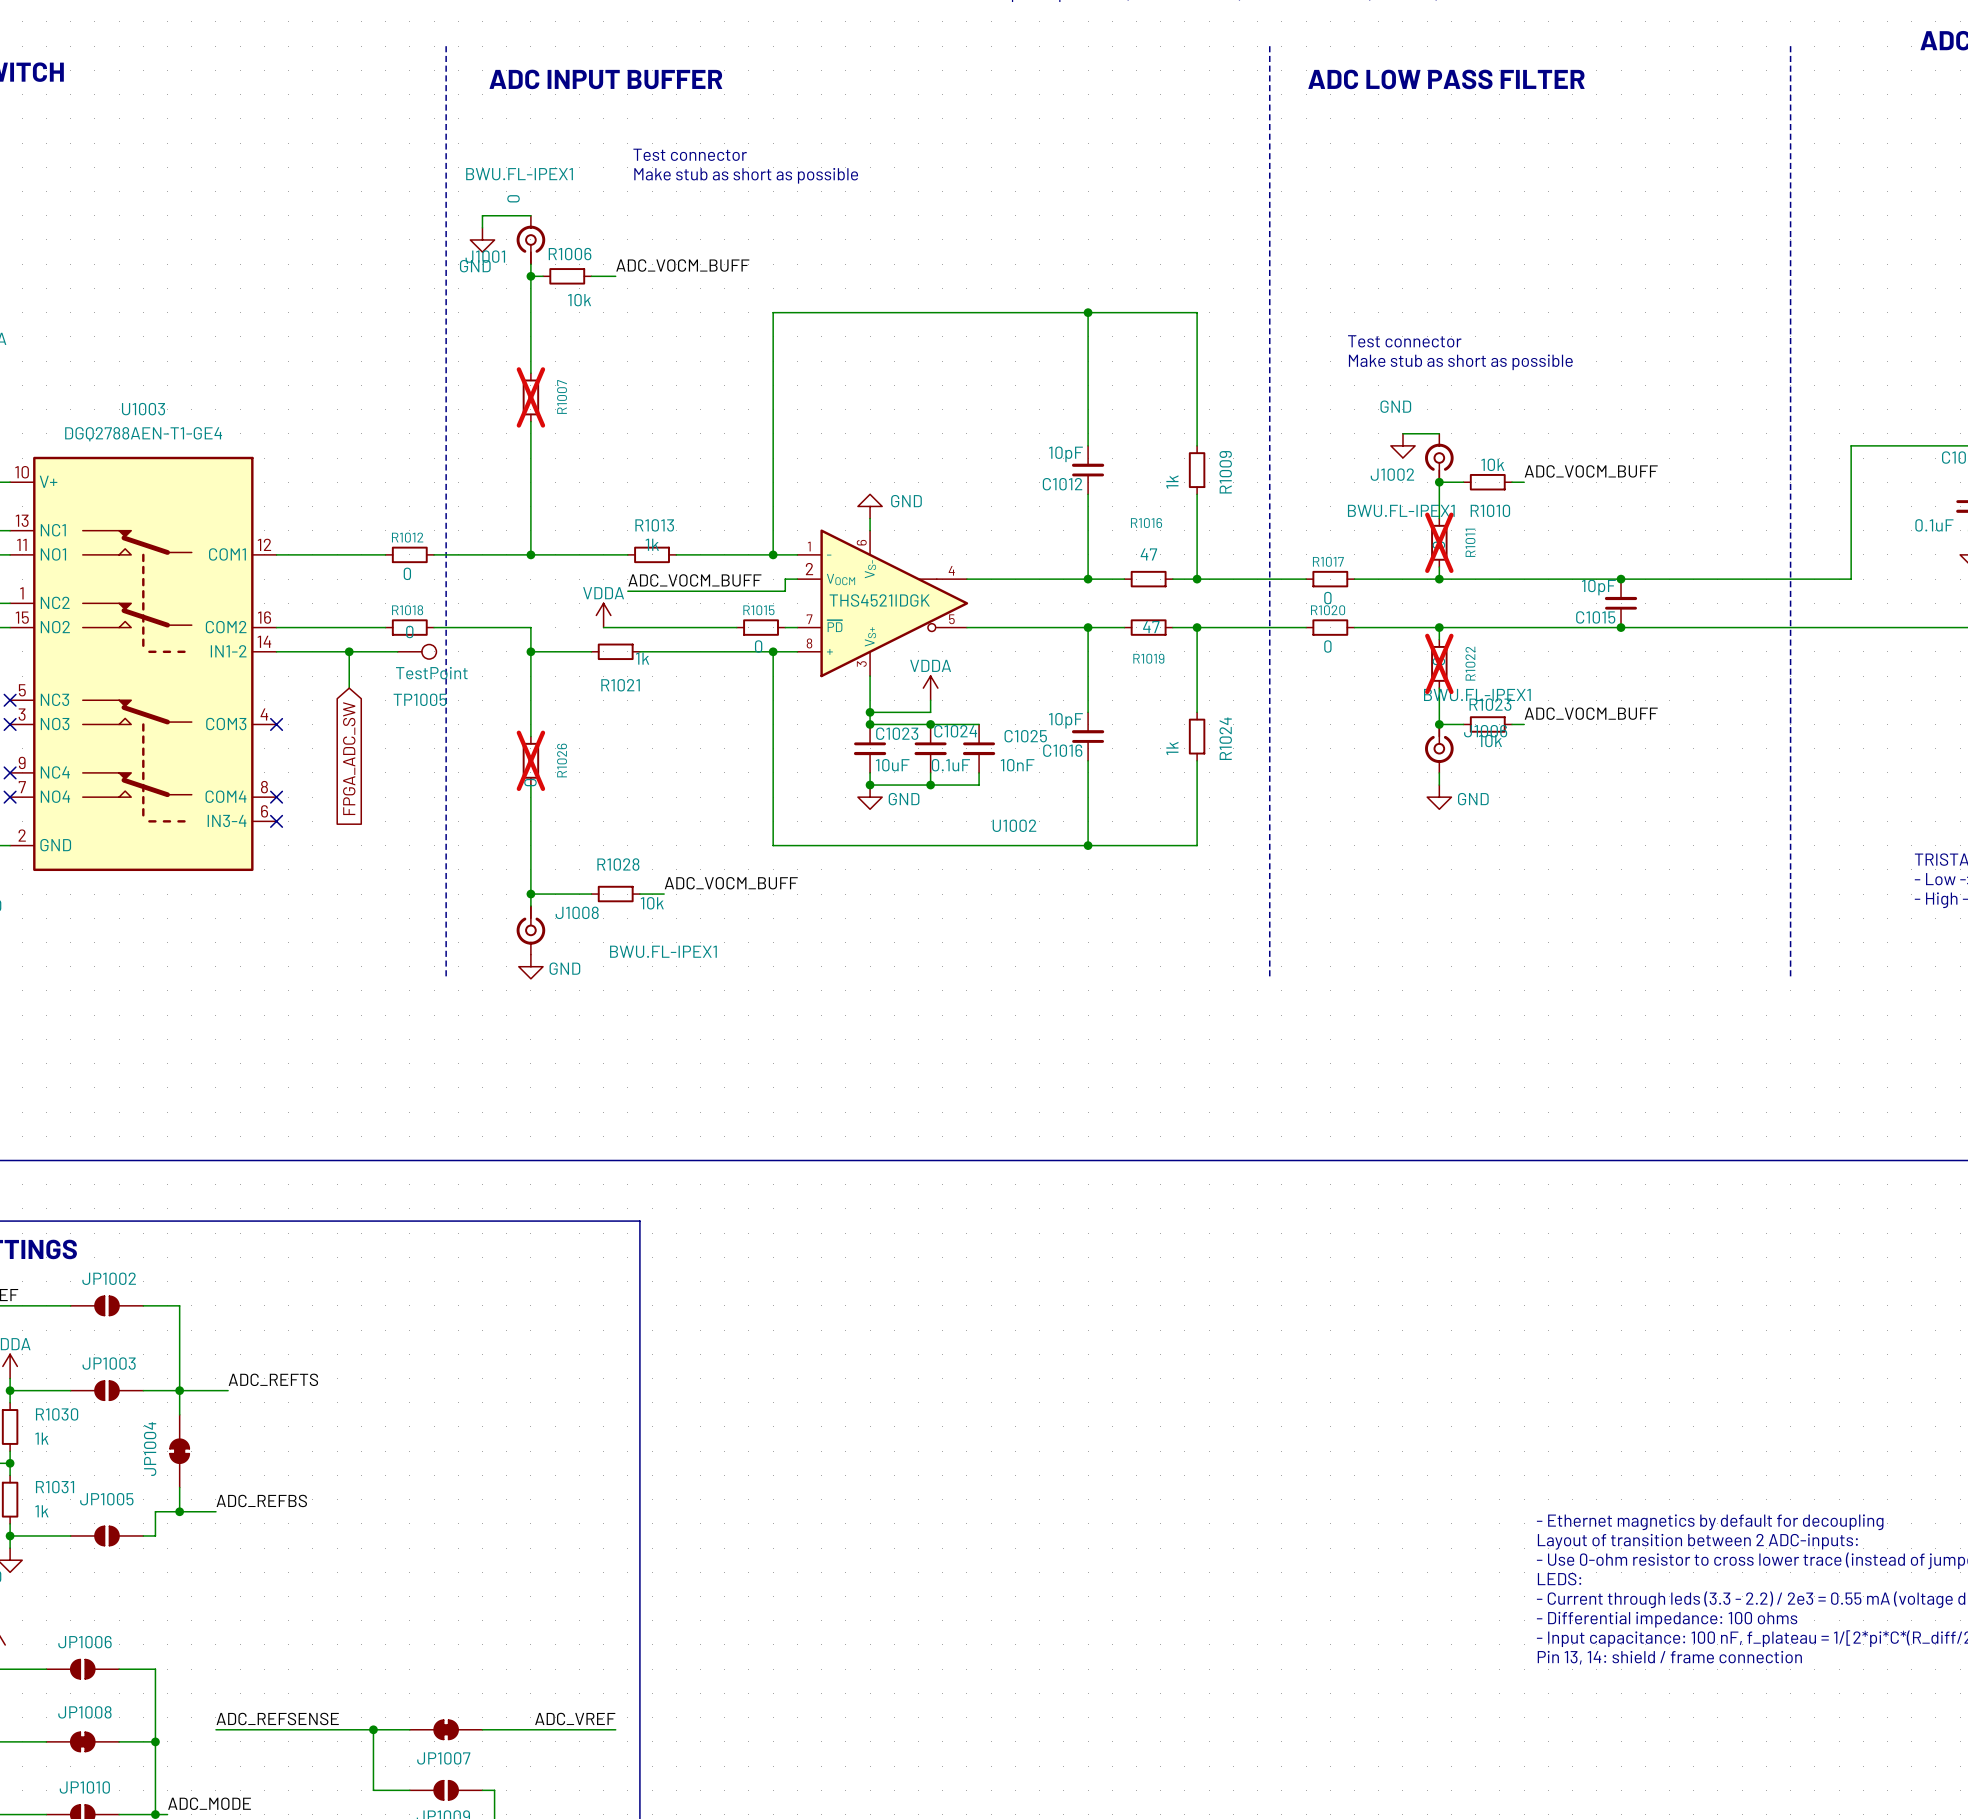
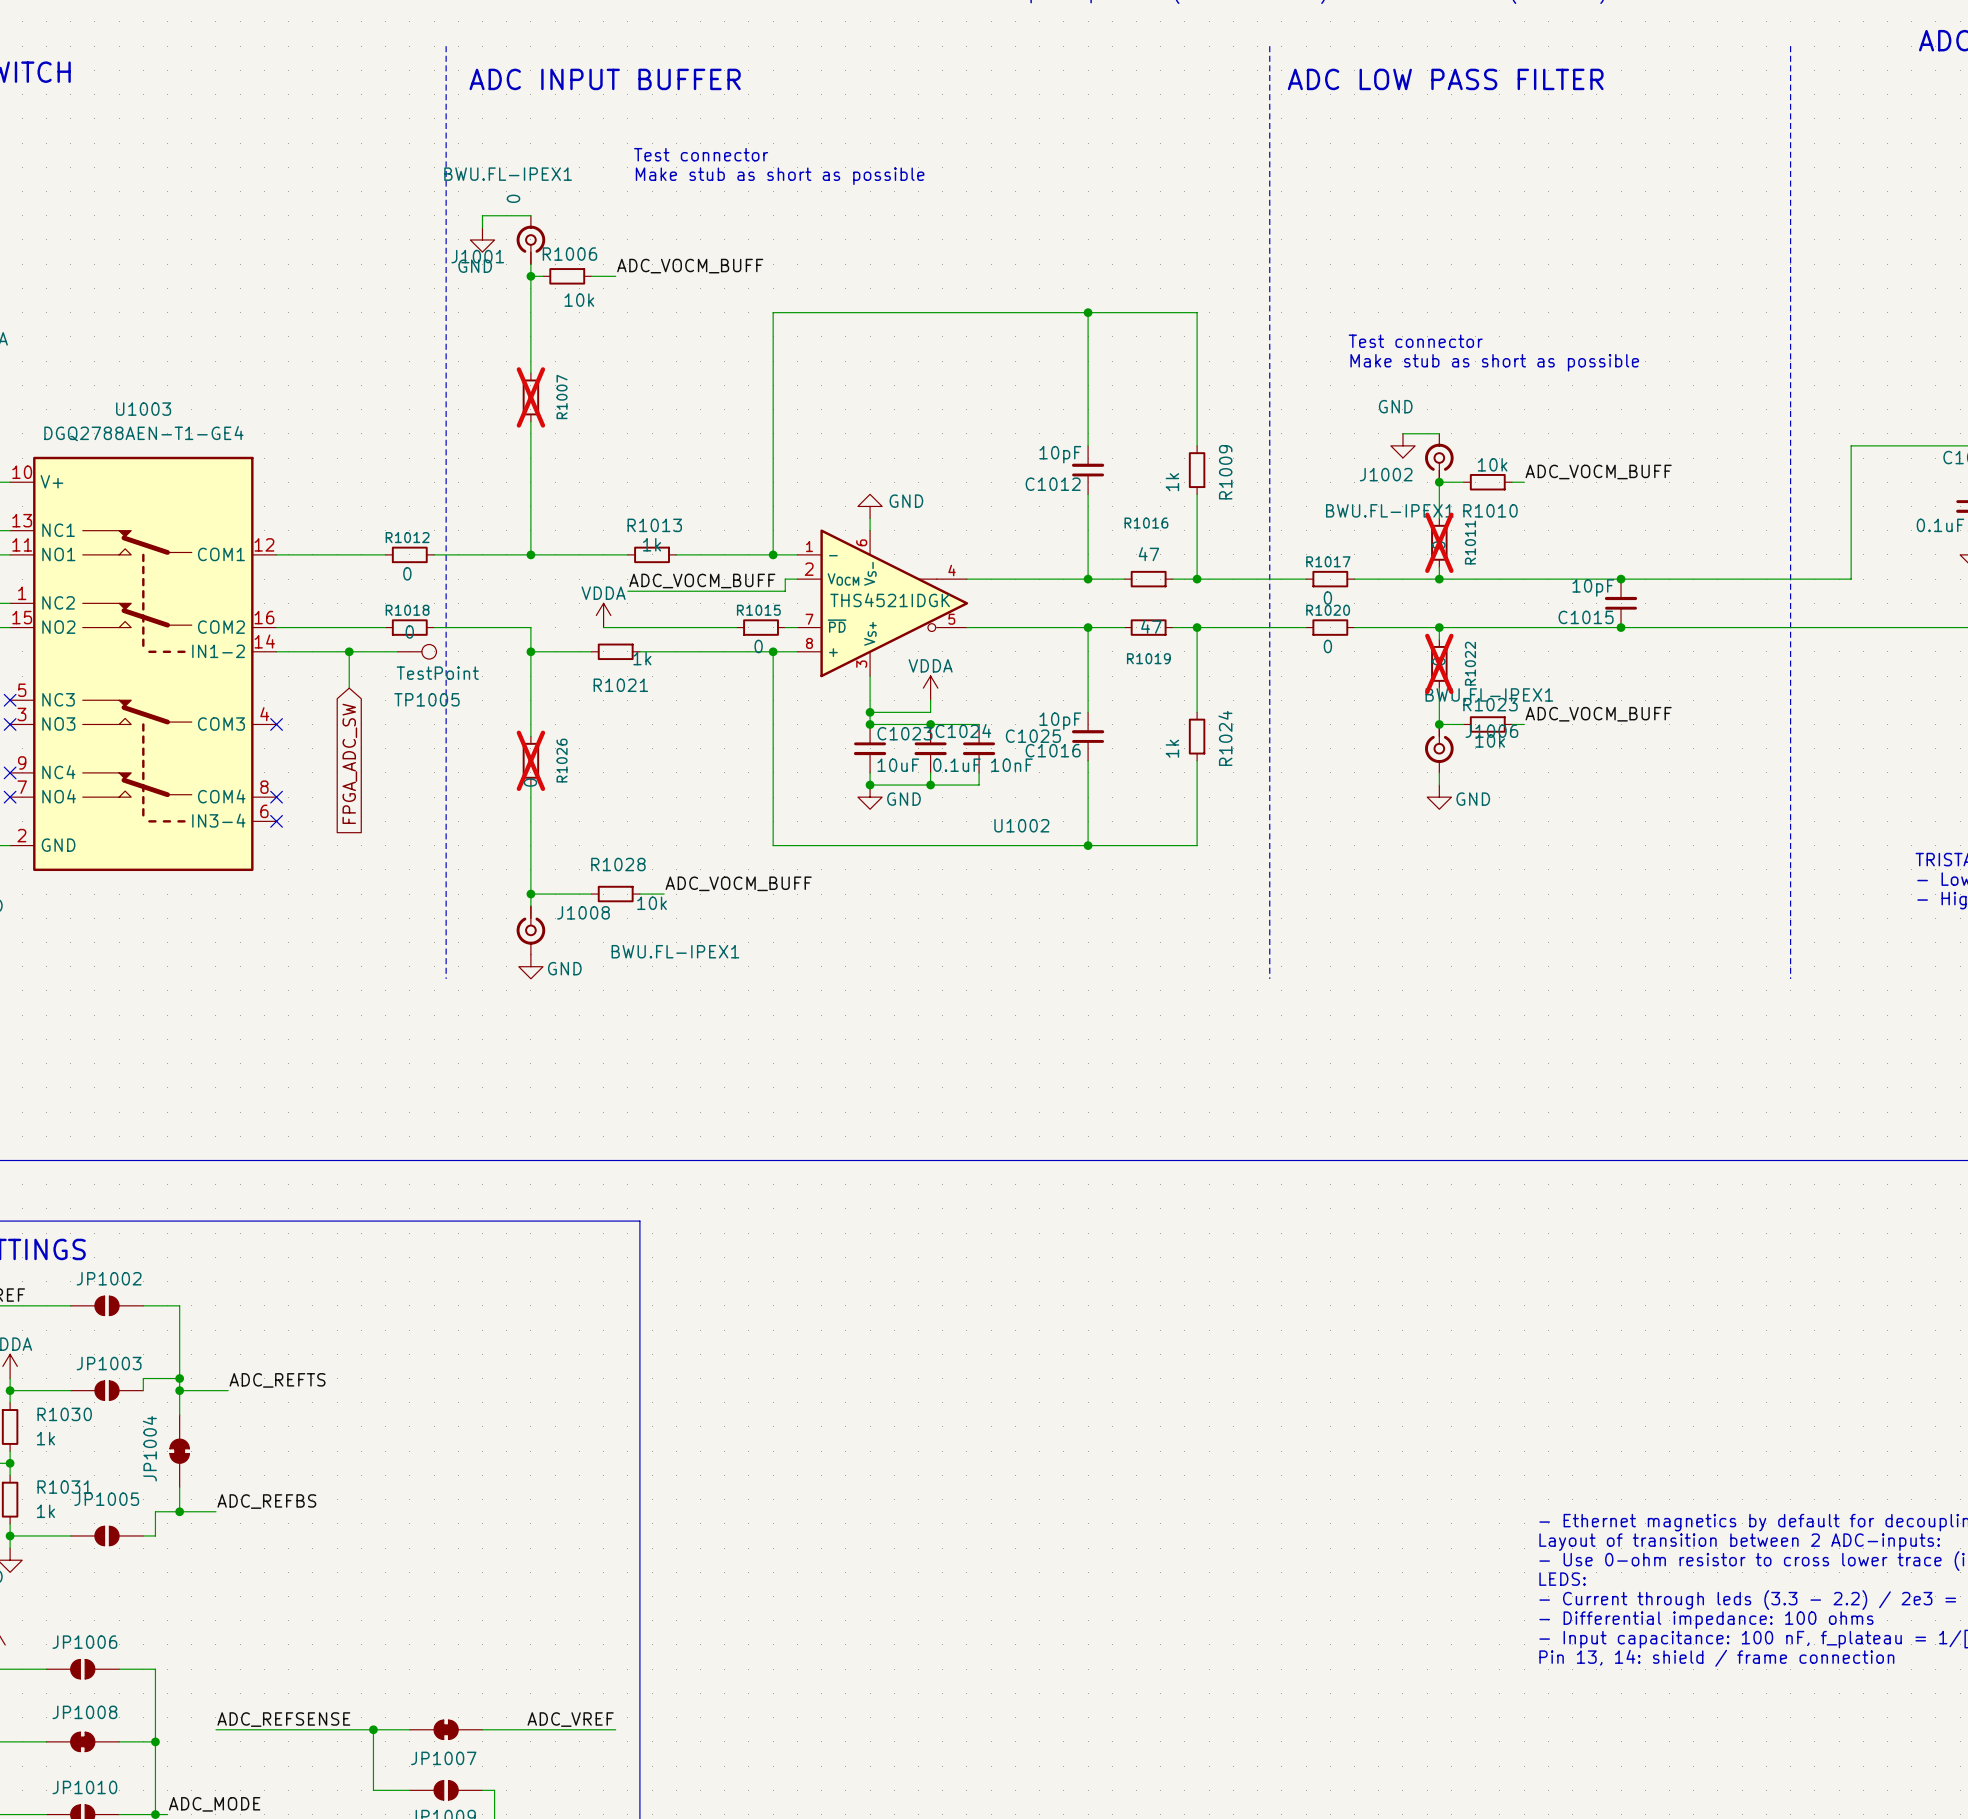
junction: none -> (179, 1378)
wire: (143, 1390) (179, 1390) -> (143, 1390) (143, 1378) (179, 1378)

